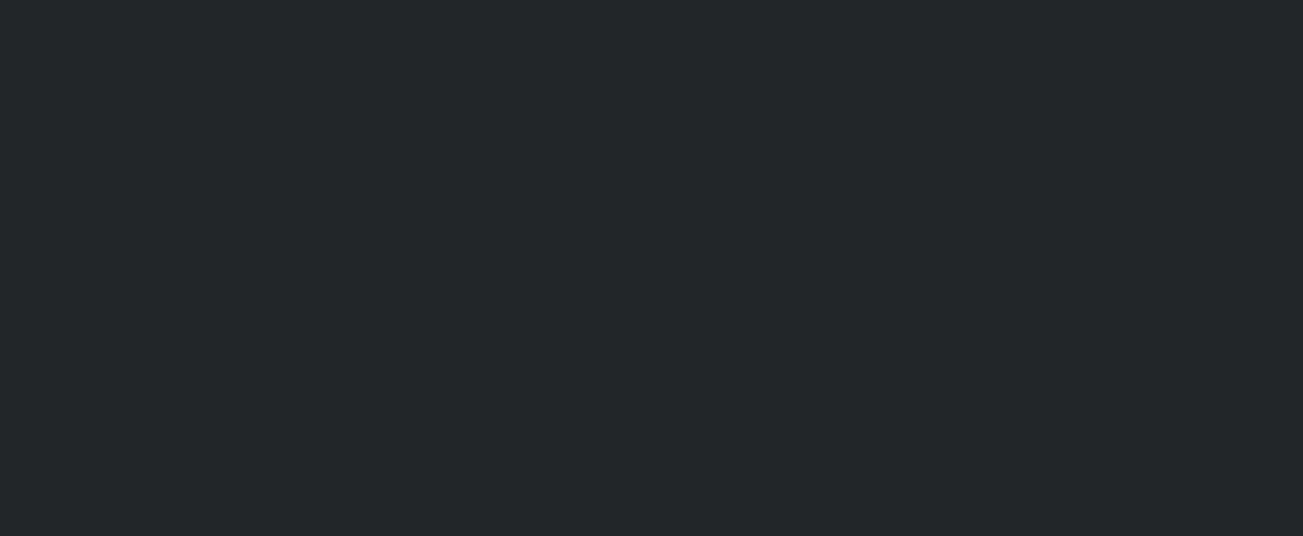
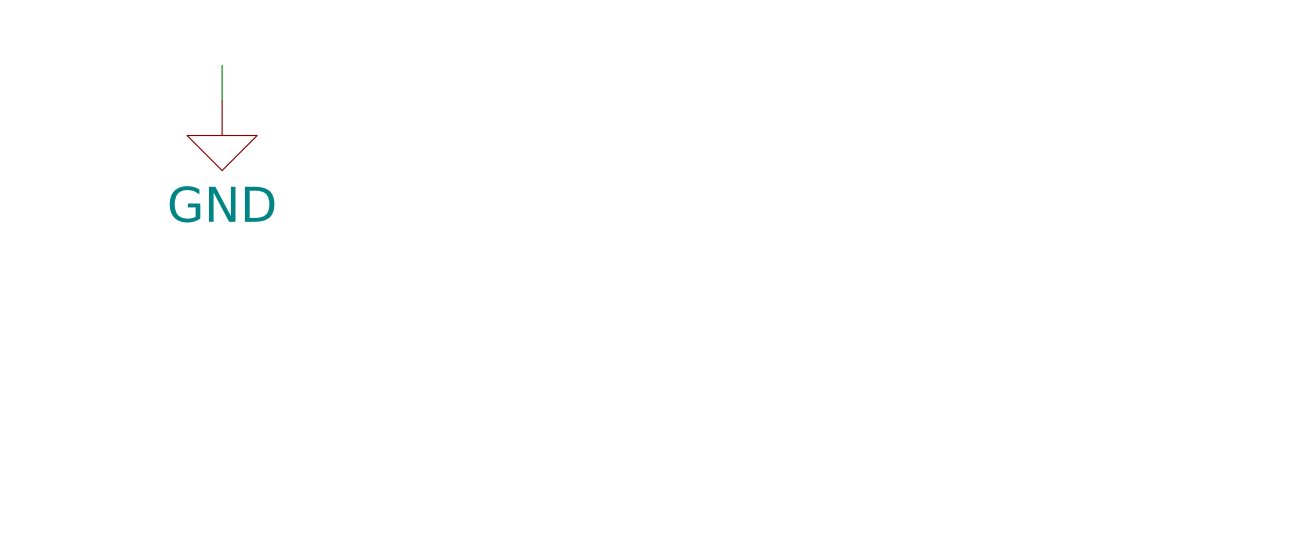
wire: none -> (222, 65) (222, 100)
power symbol: none -> GND (222, 135)

